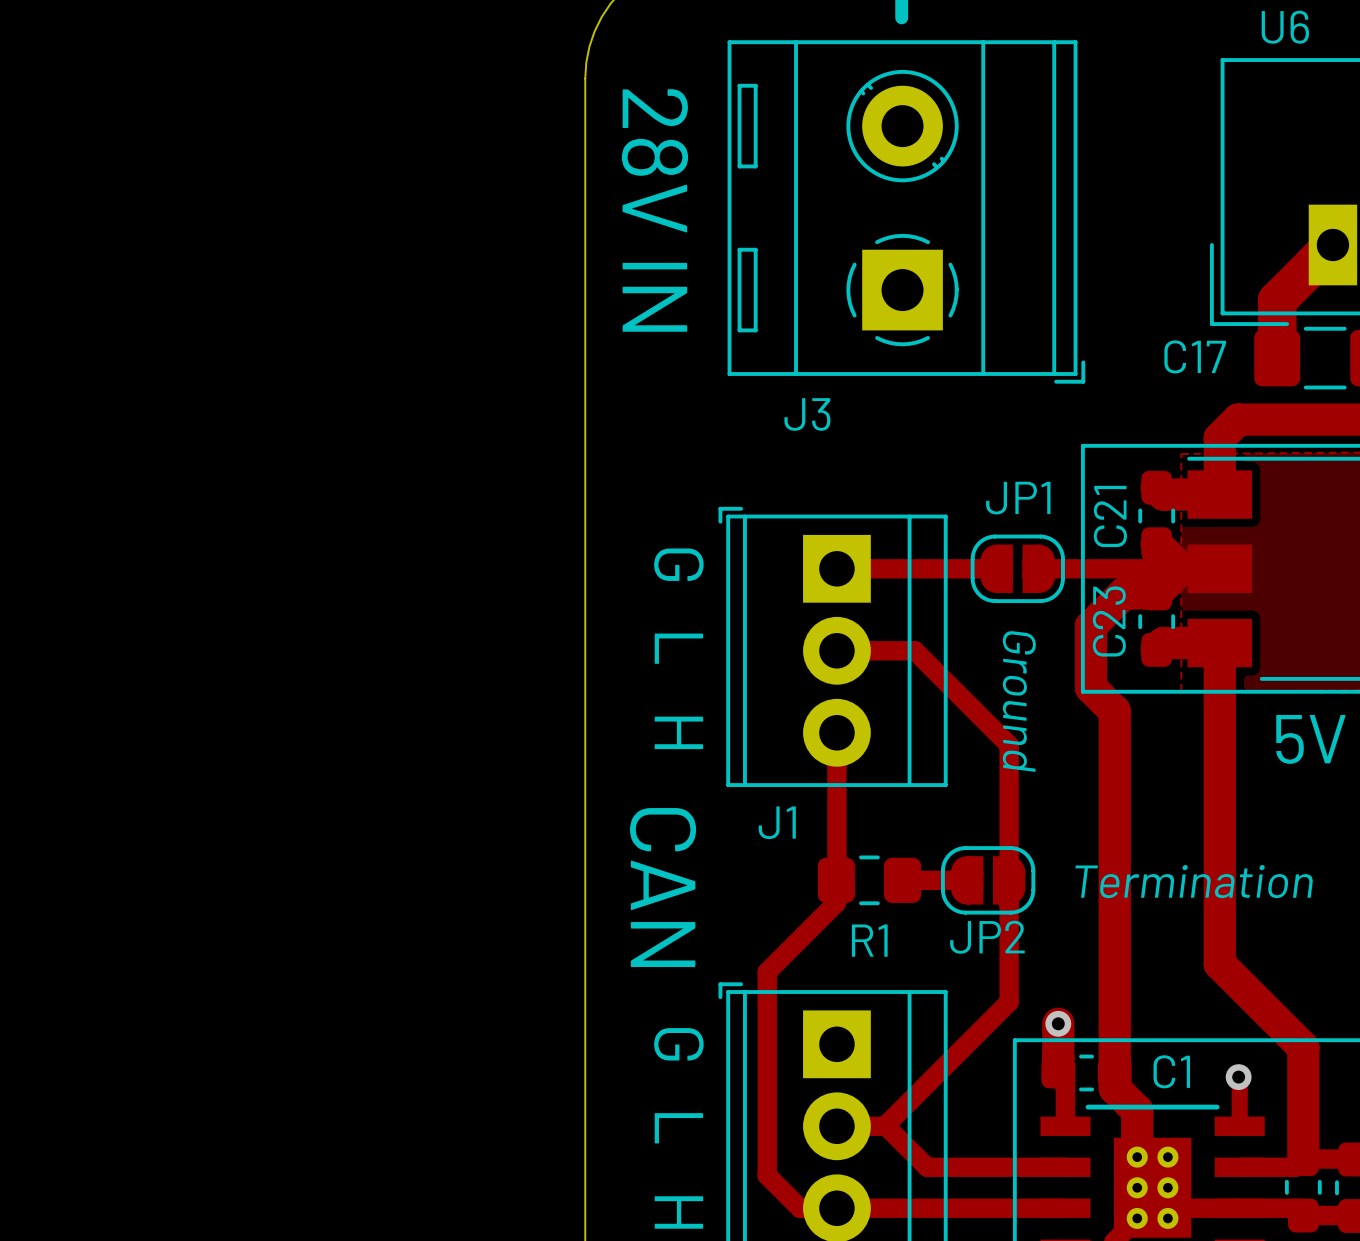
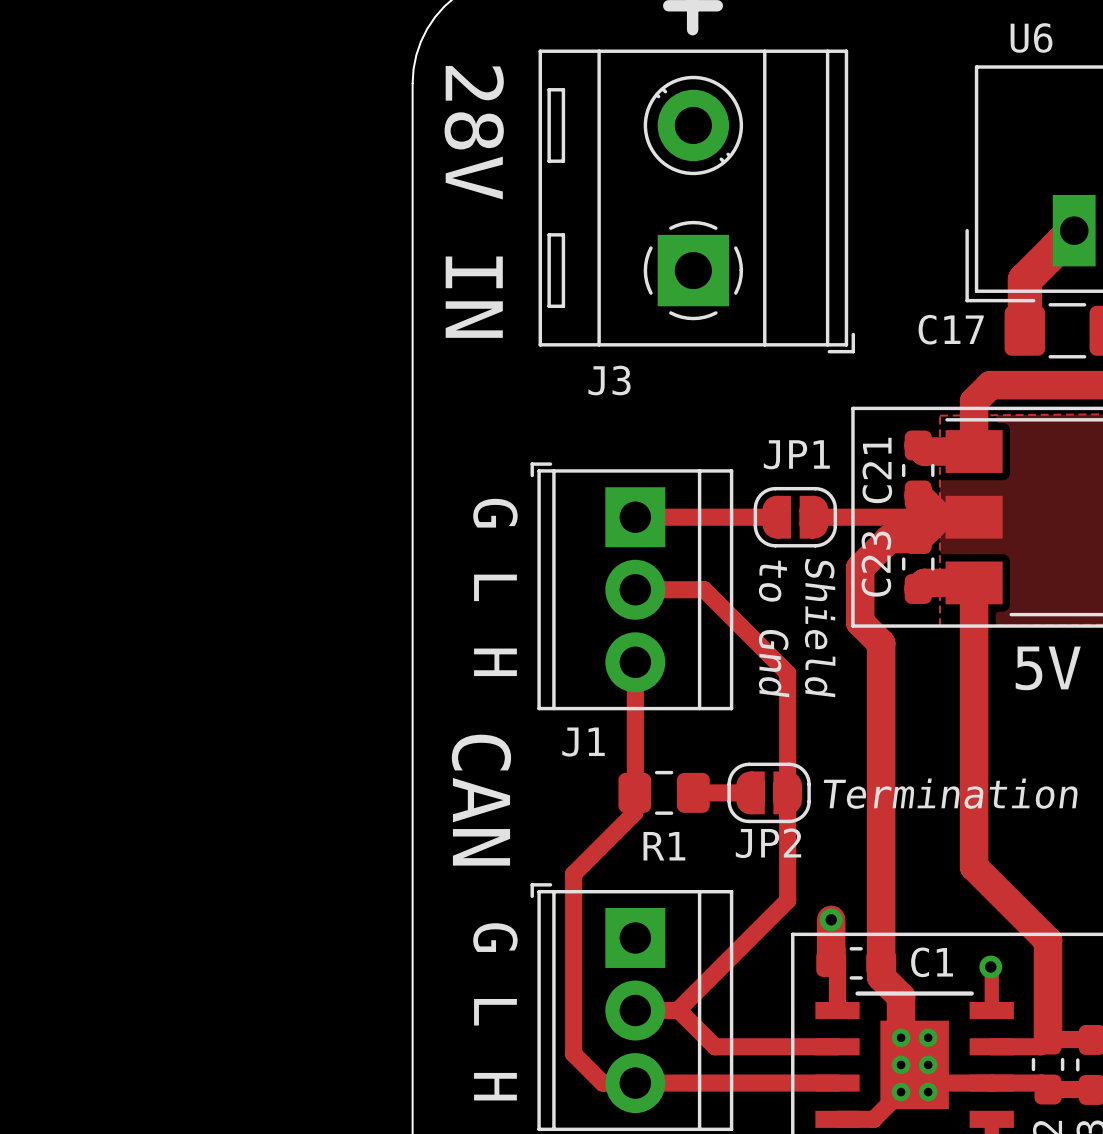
text: none -> Shield (820, 628)
text: none -> to Gnd (774, 628)
text: Ground (1019, 701) -> none

